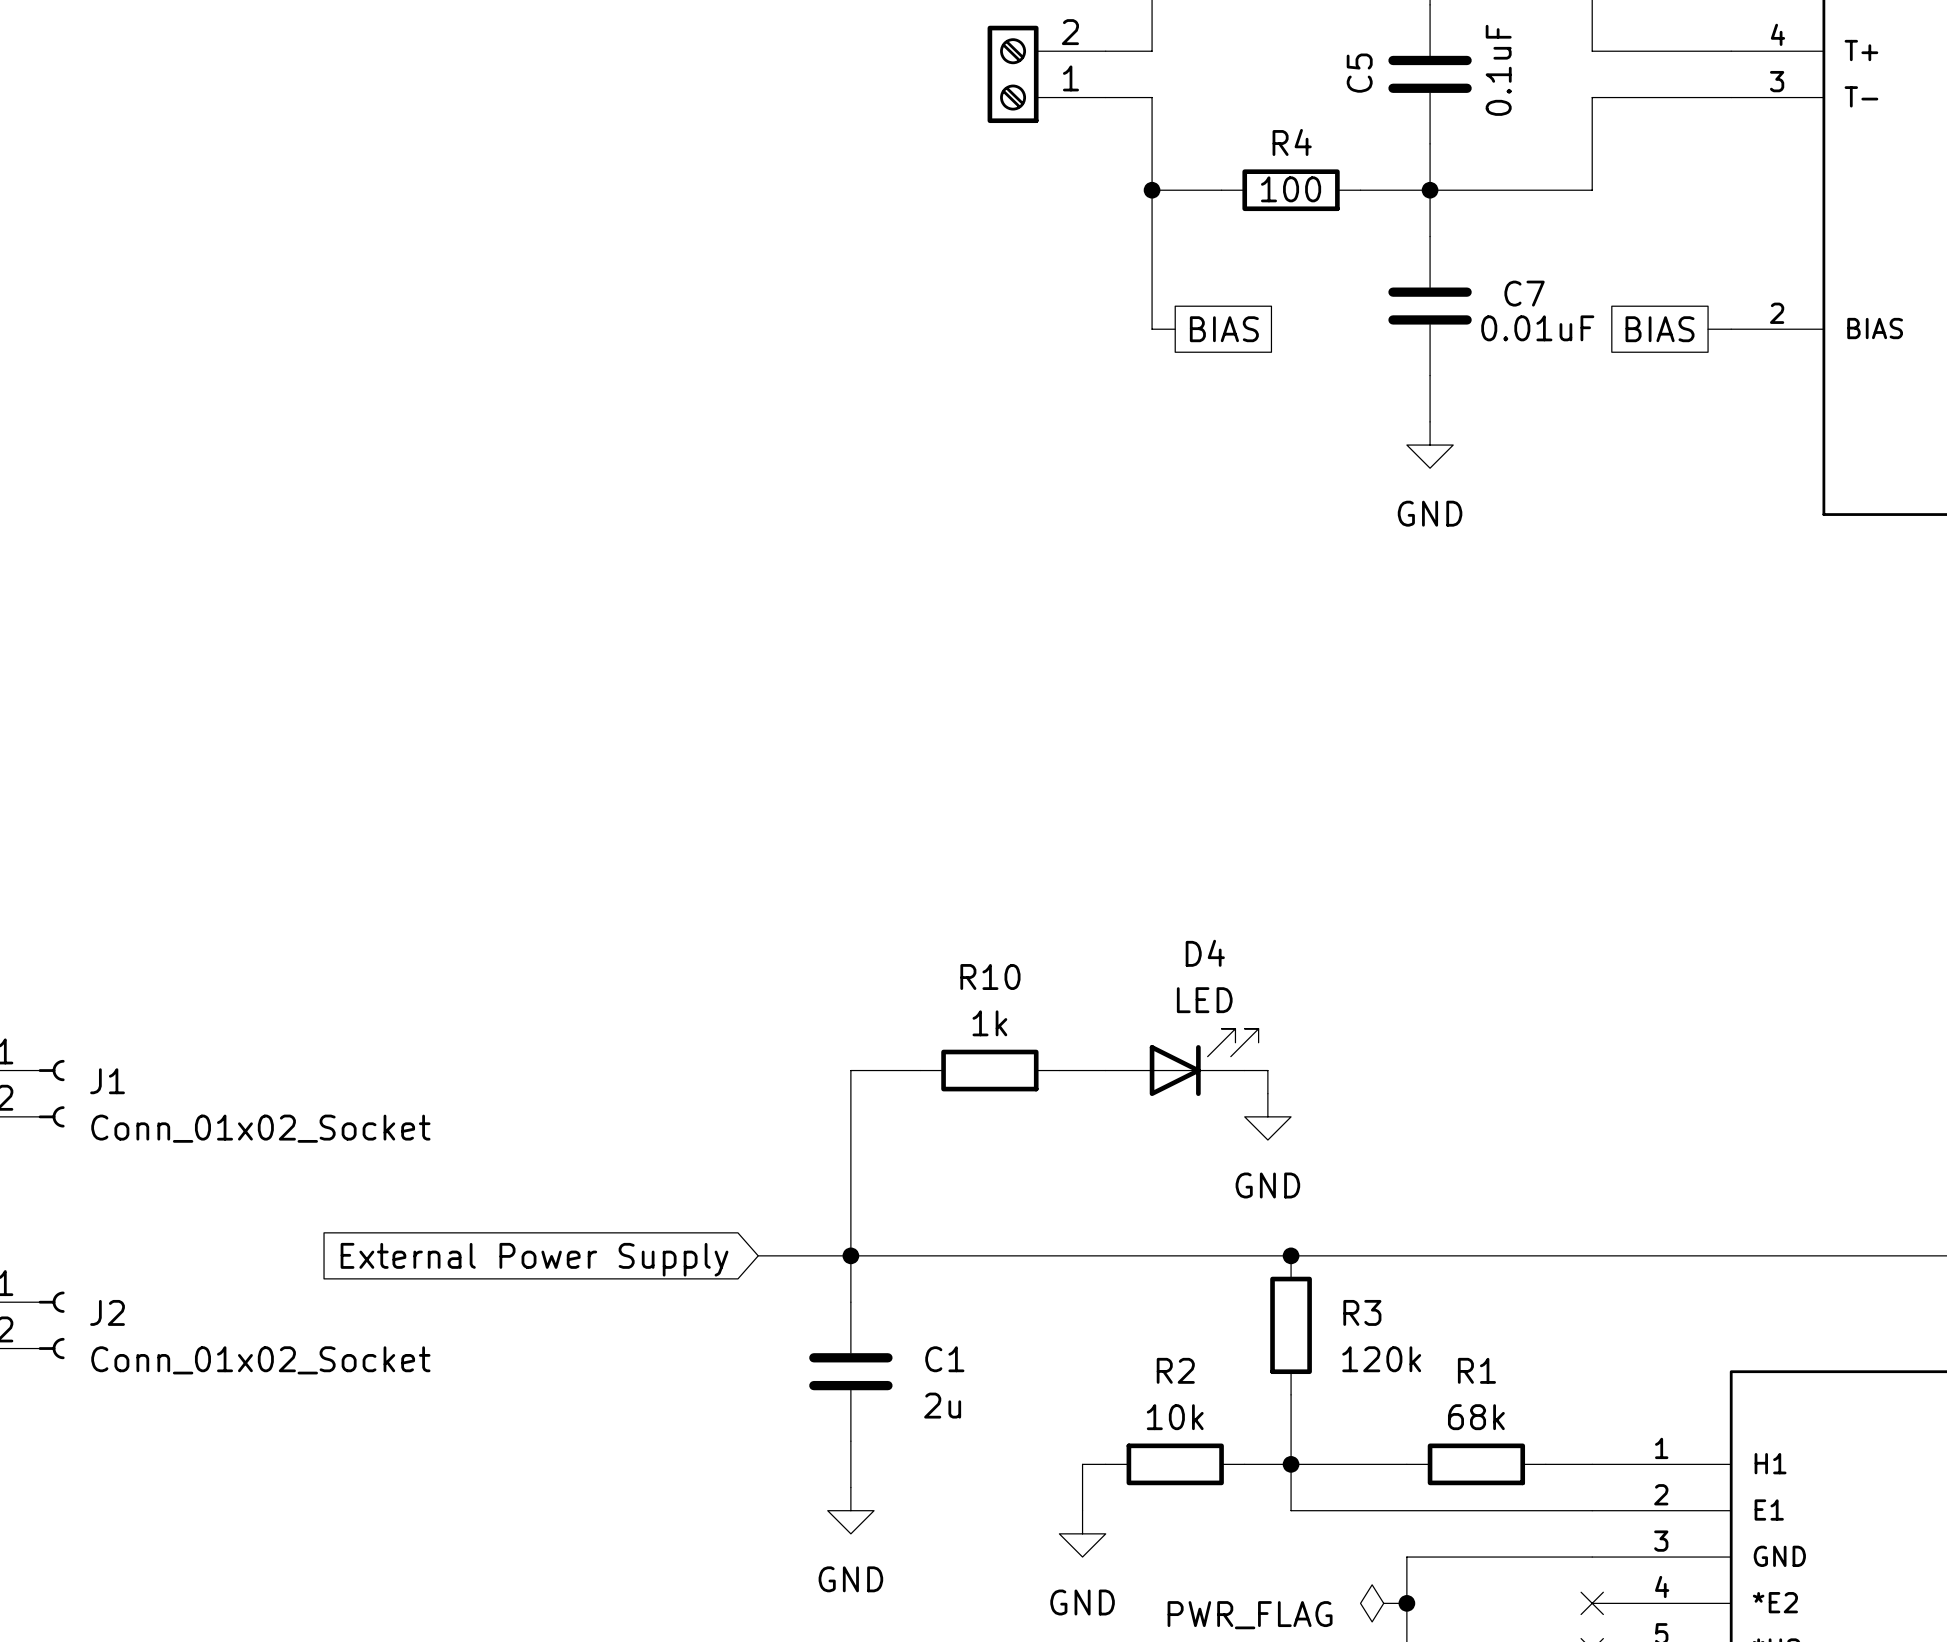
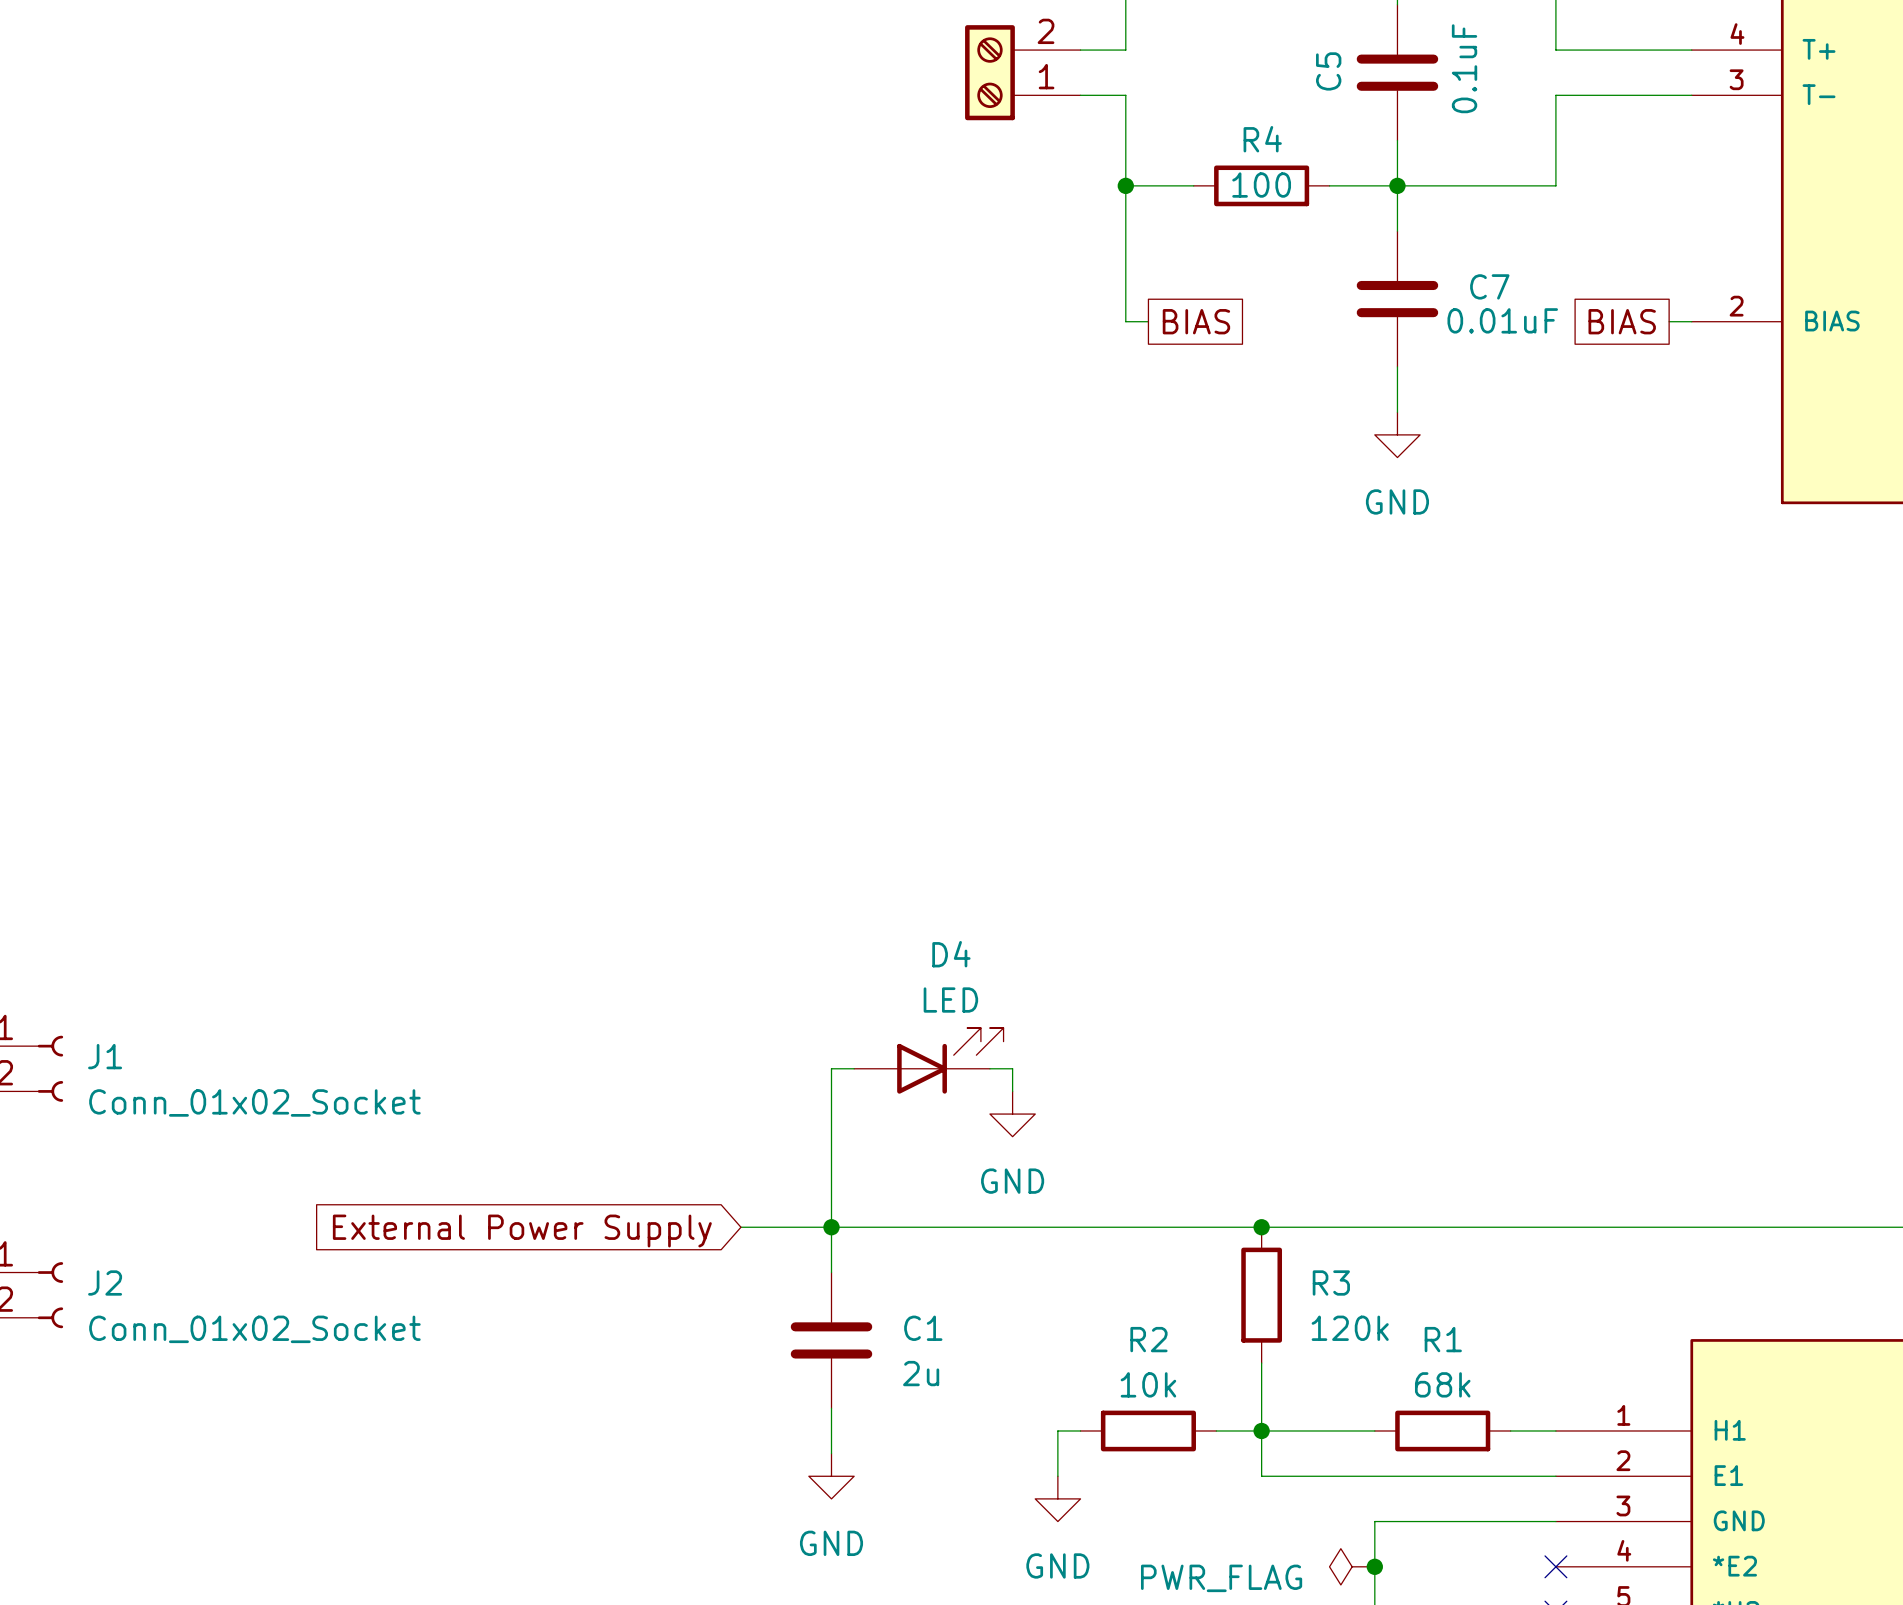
D4 position: (1182, 1062) -> (928, 1060)
wire: (920, 1070) (850, 1070) (850, 1093) -> (854, 1068) (831, 1068)
R10: 1k (989, 1070) -> none
wire: (1059, 1070) (1105, 1070) -> none
wire: (1244, 1070) (1267, 1070) (1267, 1093) -> (989, 1068) (1012, 1068) (1012, 1091)
power symbol position: GND (1267, 1116) -> GND (1012, 1114)

